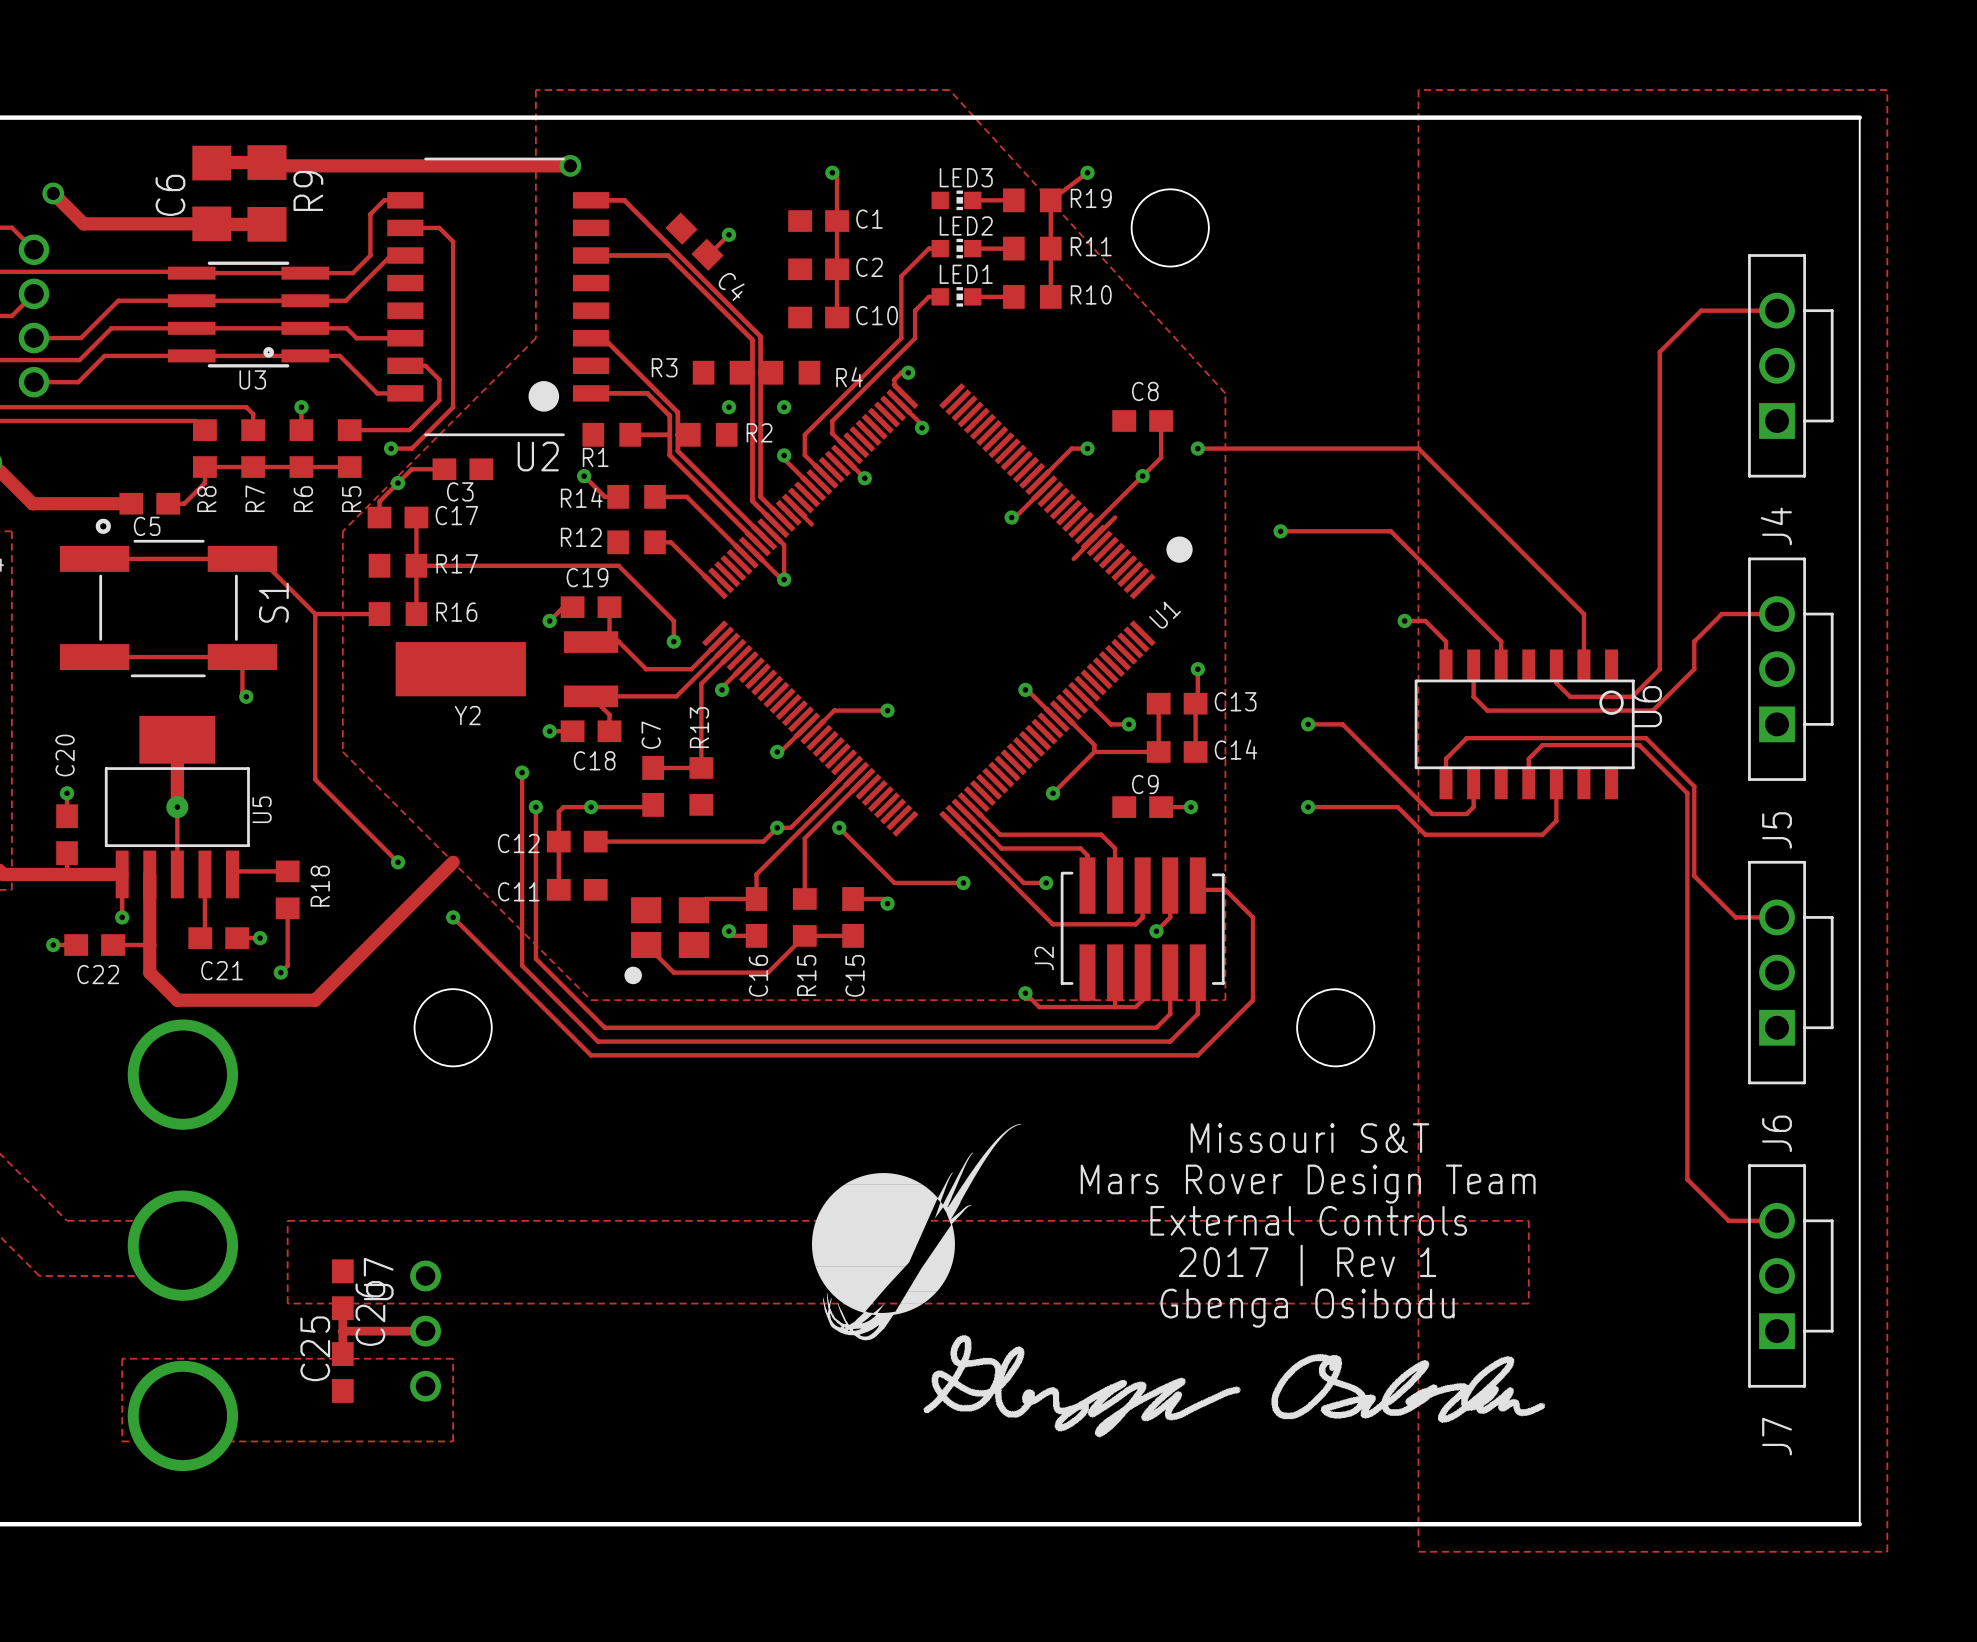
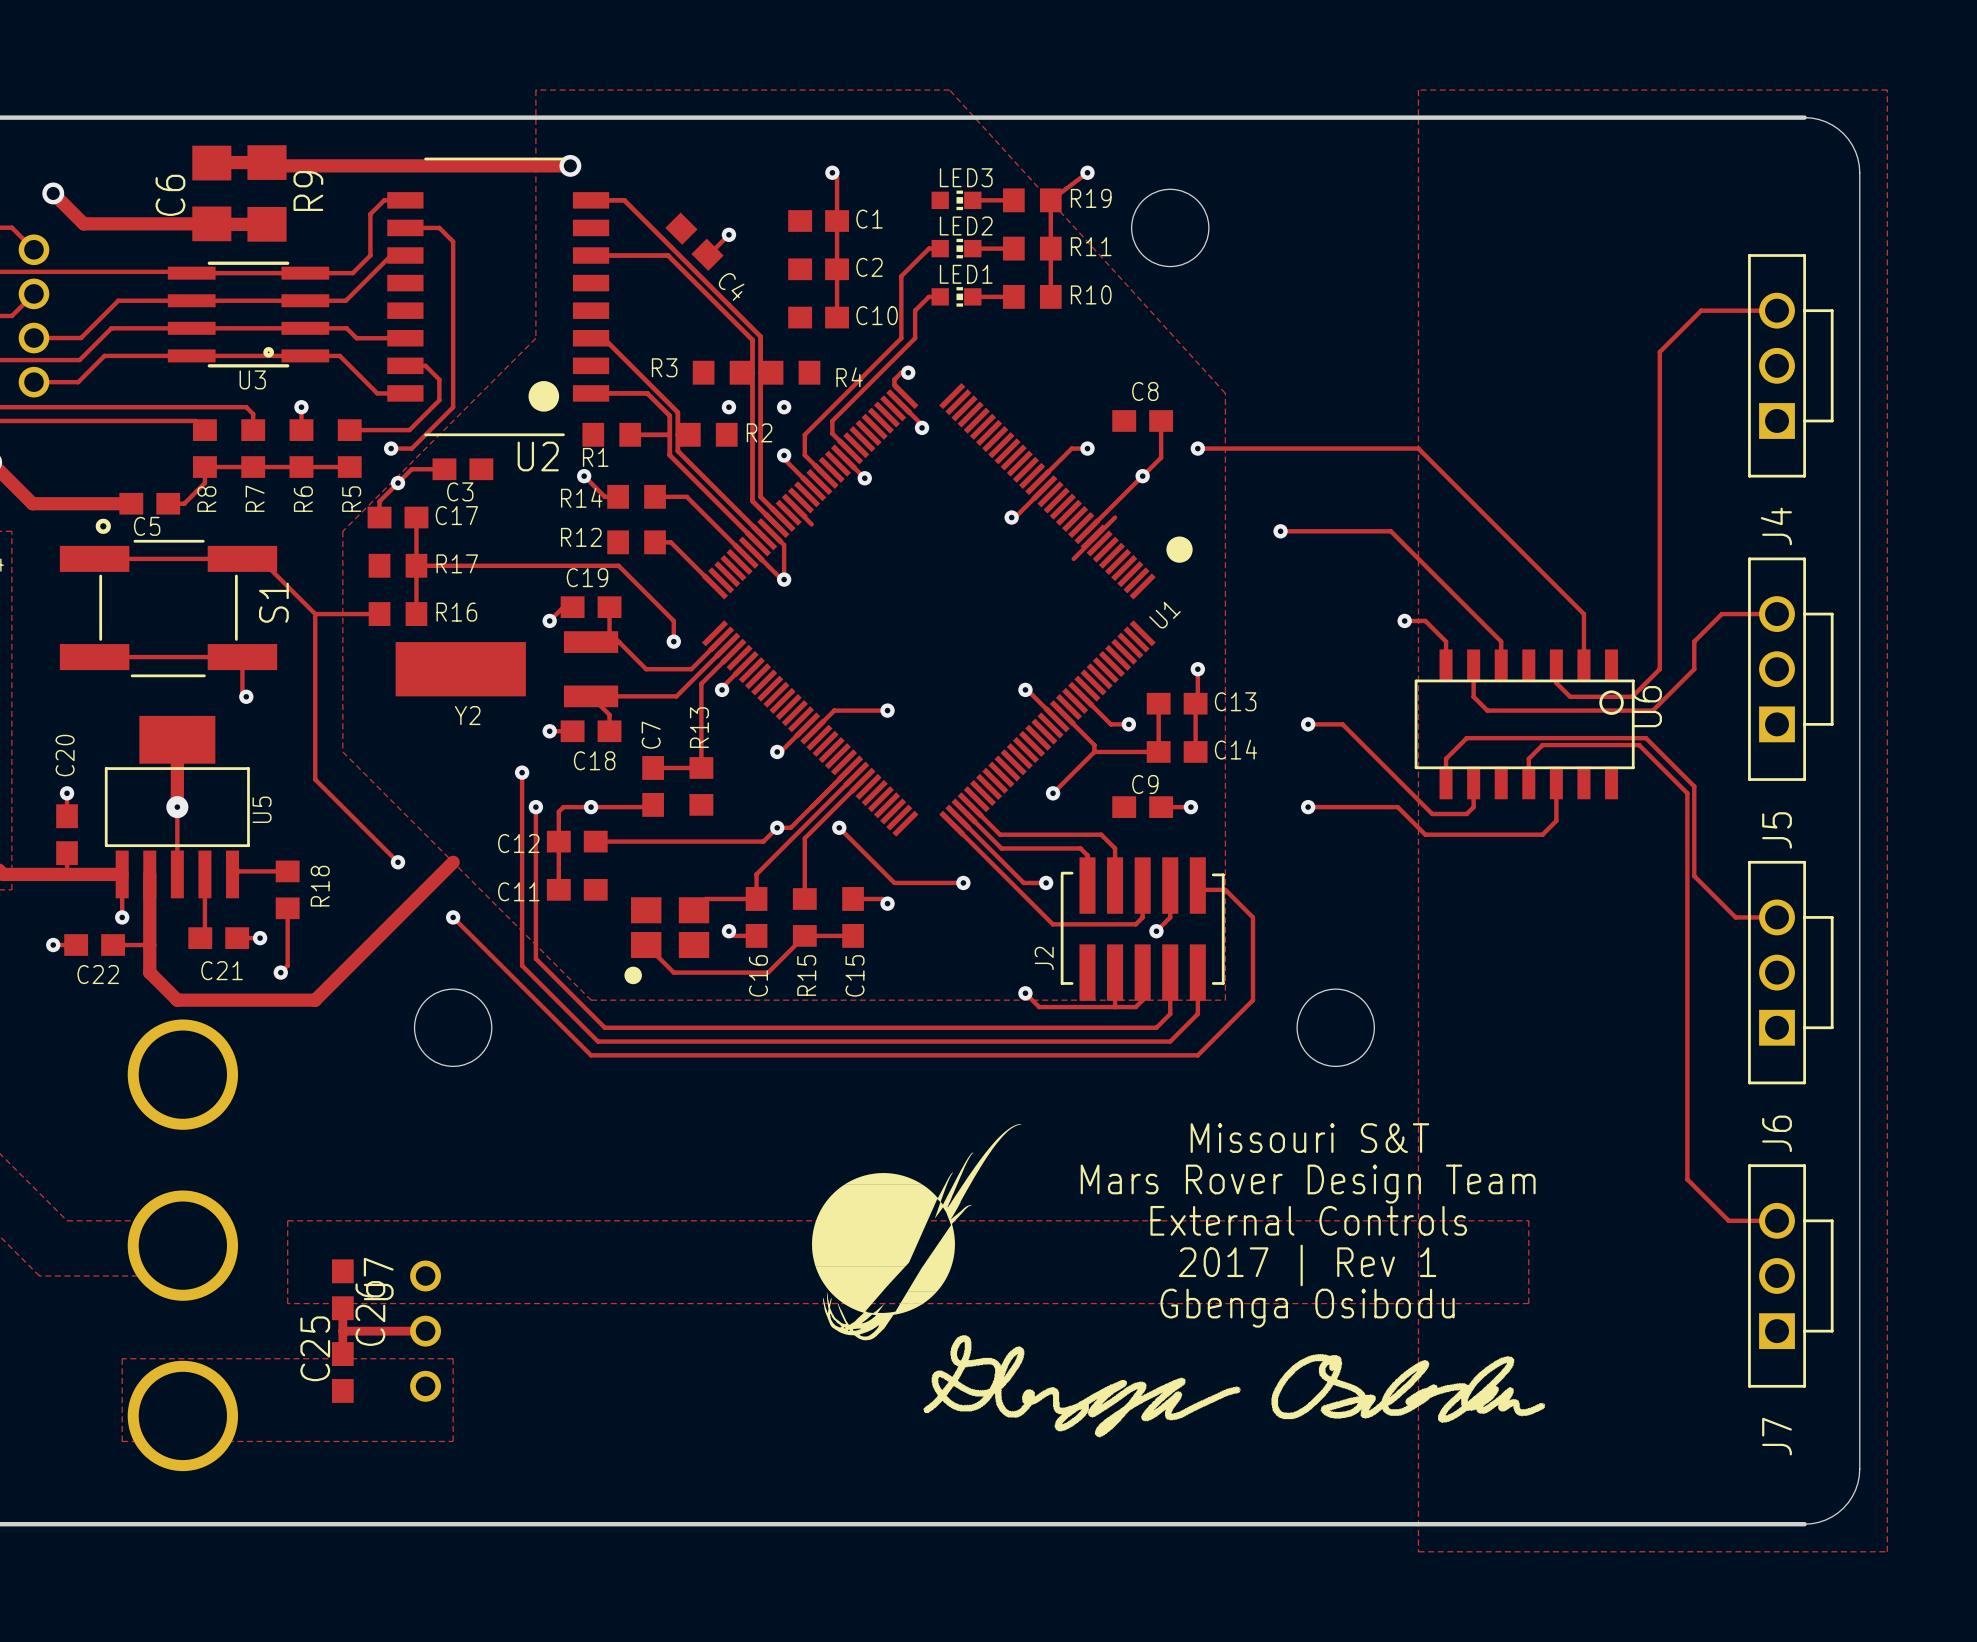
board edge: (1804, 117) (1859, 117) (1859, 172) -> (1804, 117) (1825, 121) (1843, 133) (1855, 151) (1859, 172)
board edge: (1859, 1469) (1859, 1524) (1804, 1524) -> (1859, 1469) (1855, 1490) (1843, 1508) (1825, 1520) (1804, 1524)

